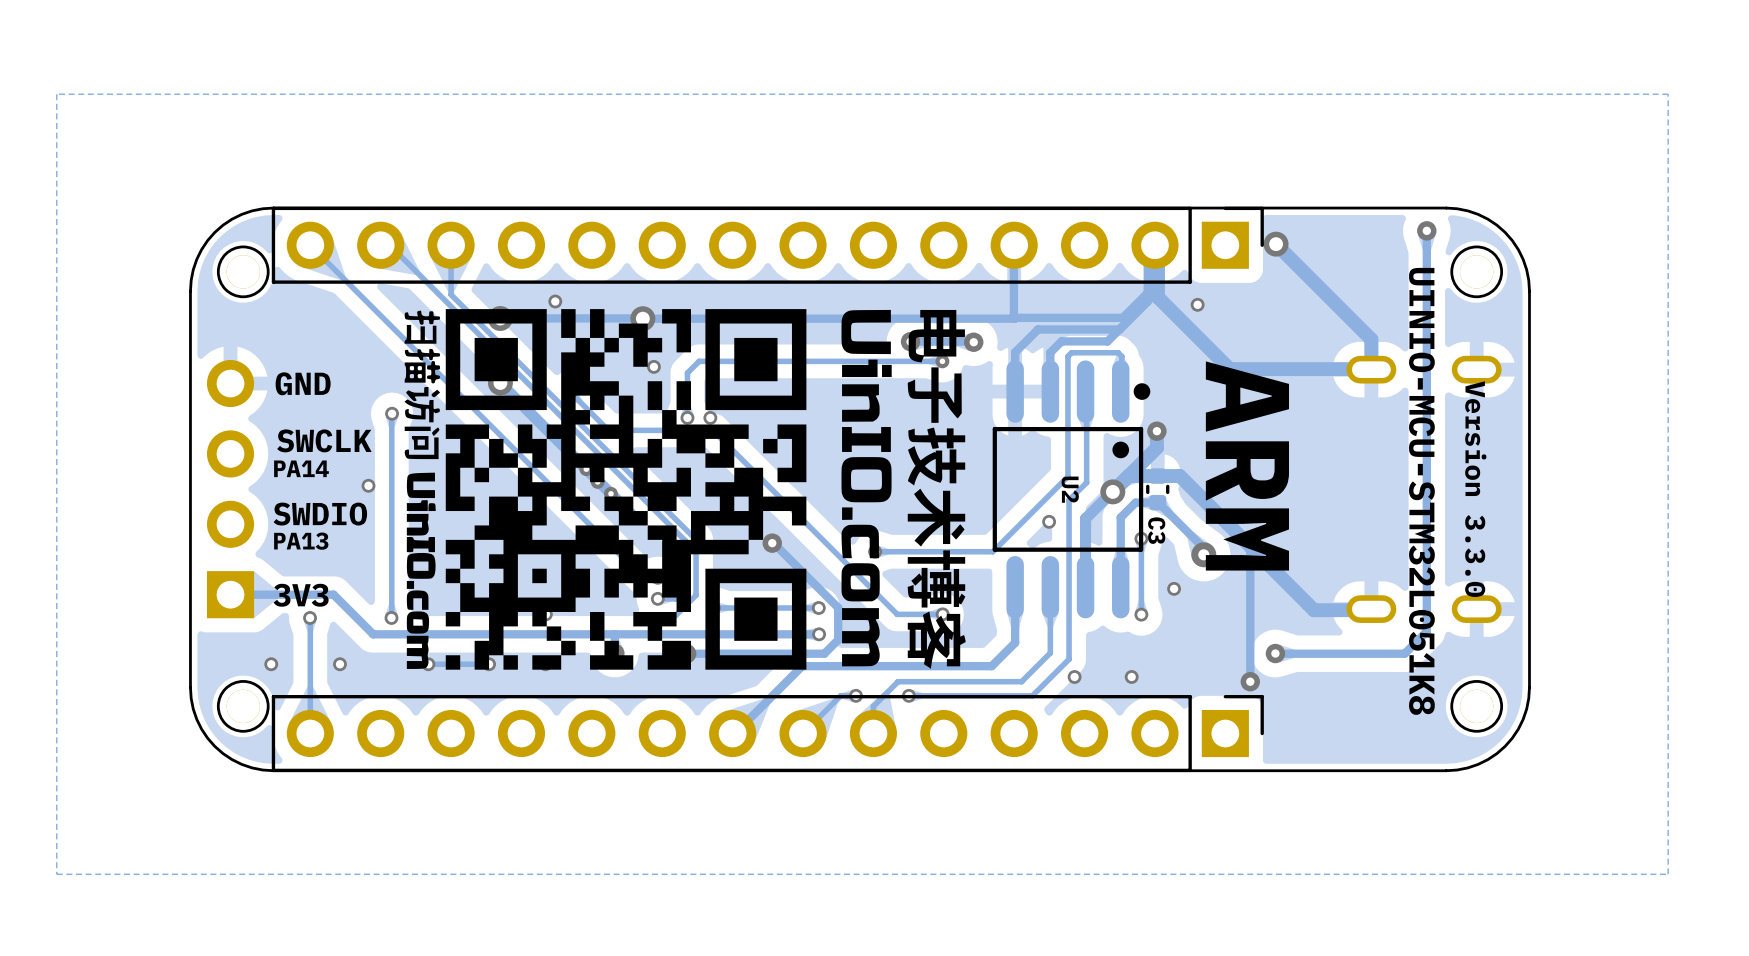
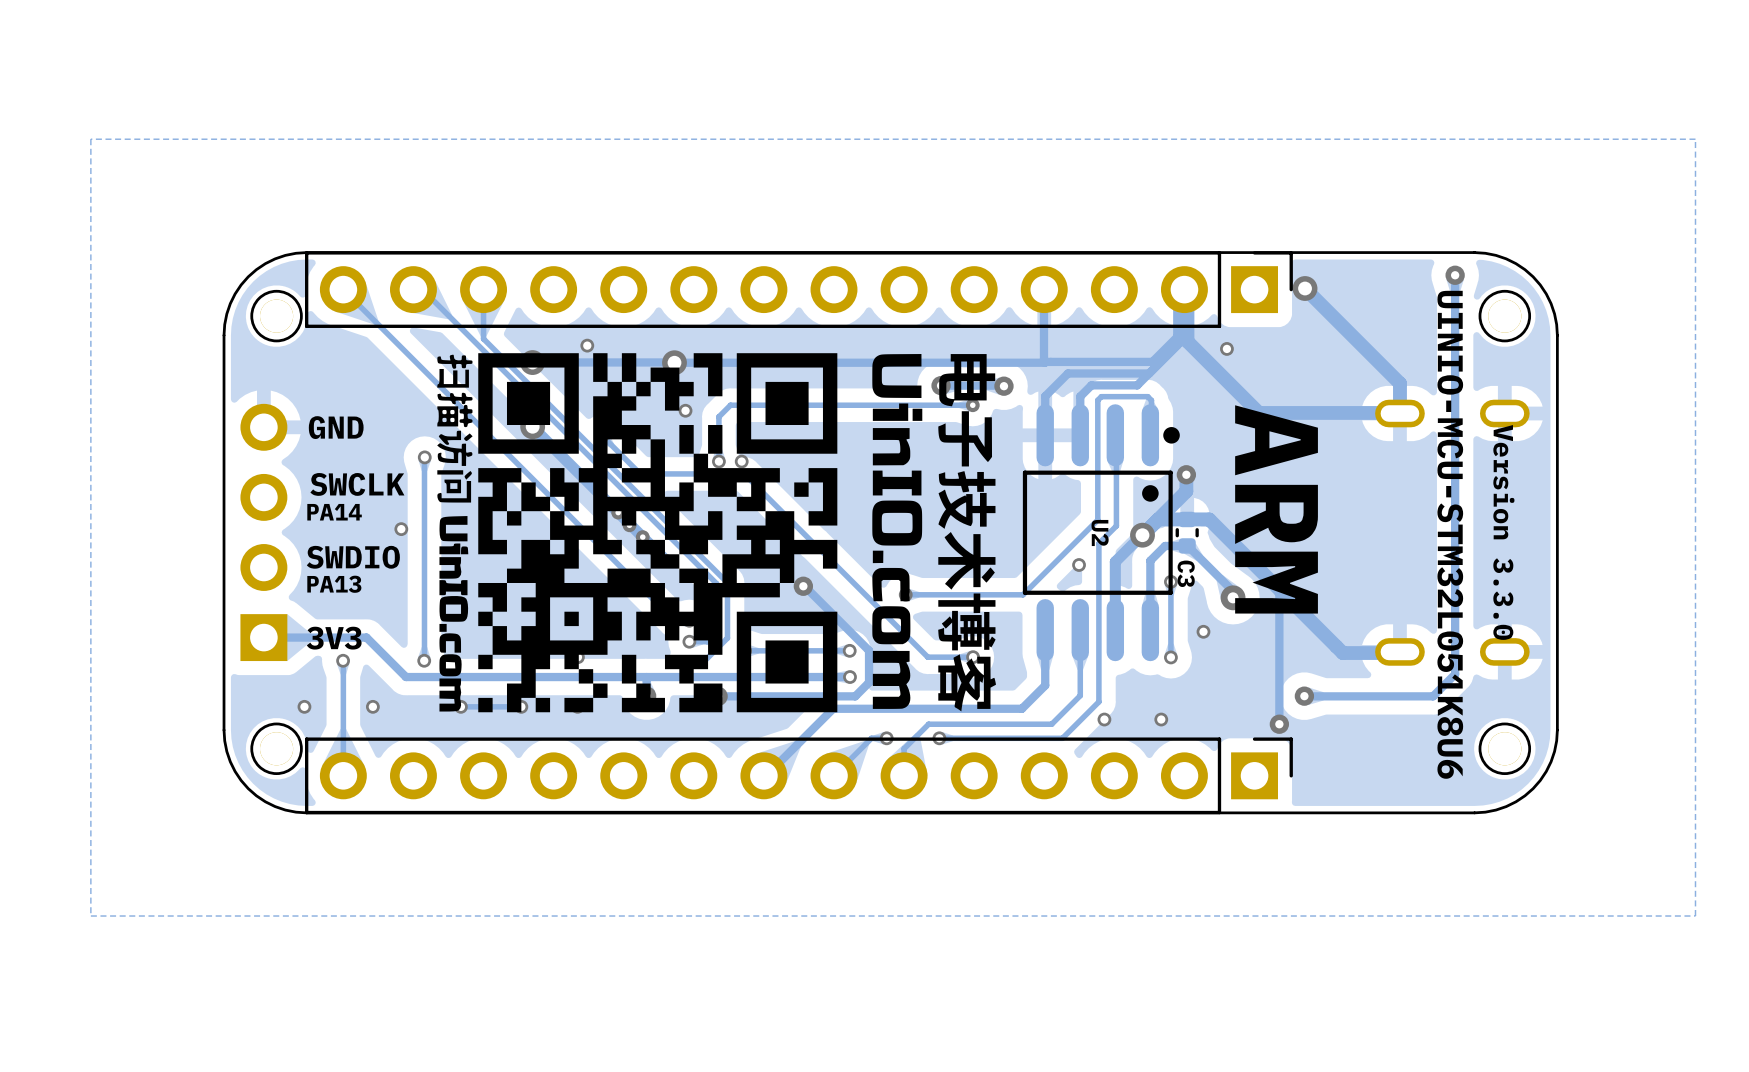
text: UINIO-MCU-STM32L051K8 (1421, 491) -> UINIO-MCU-STM32L051K8U6 (1450, 534)

